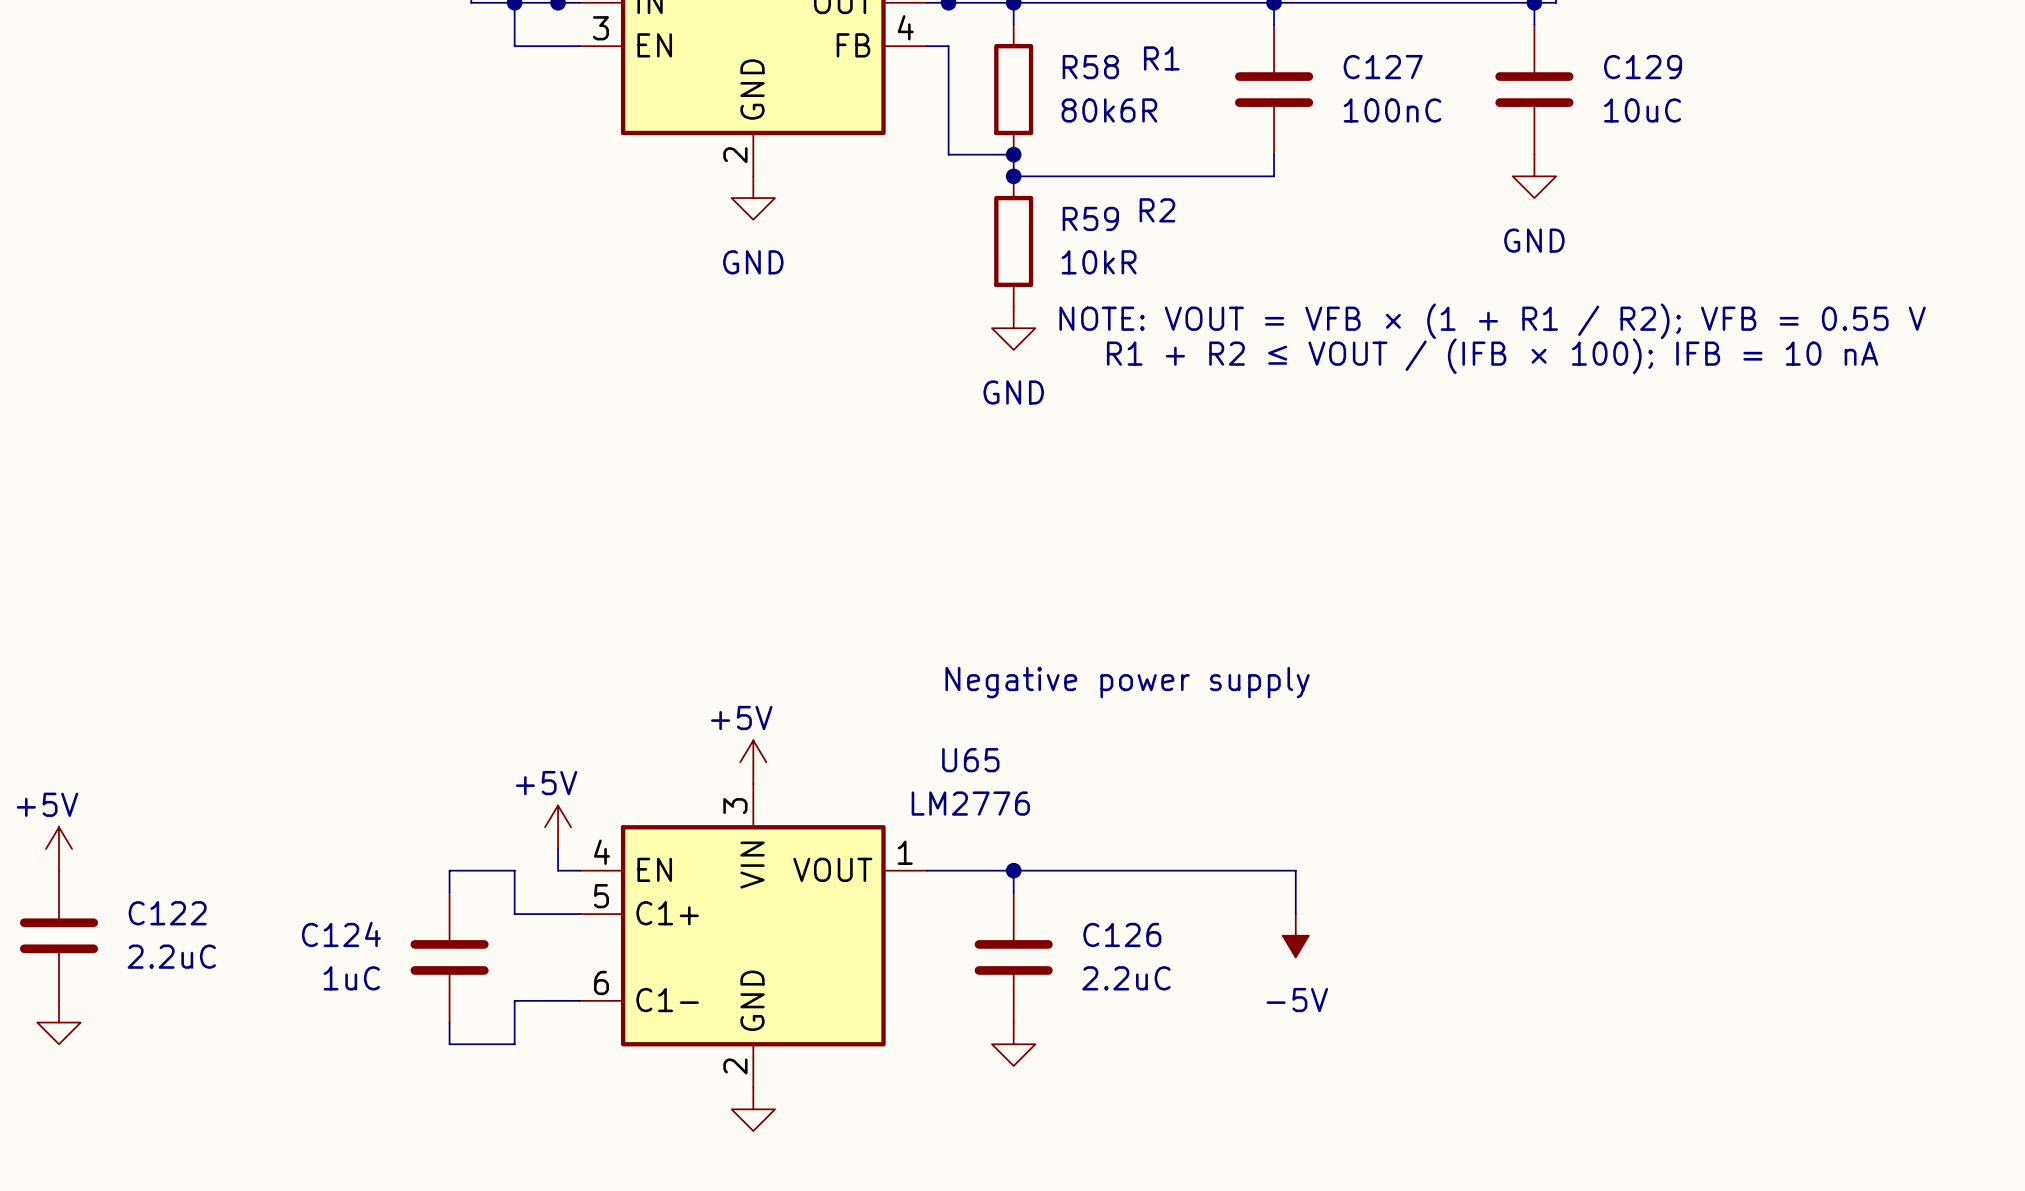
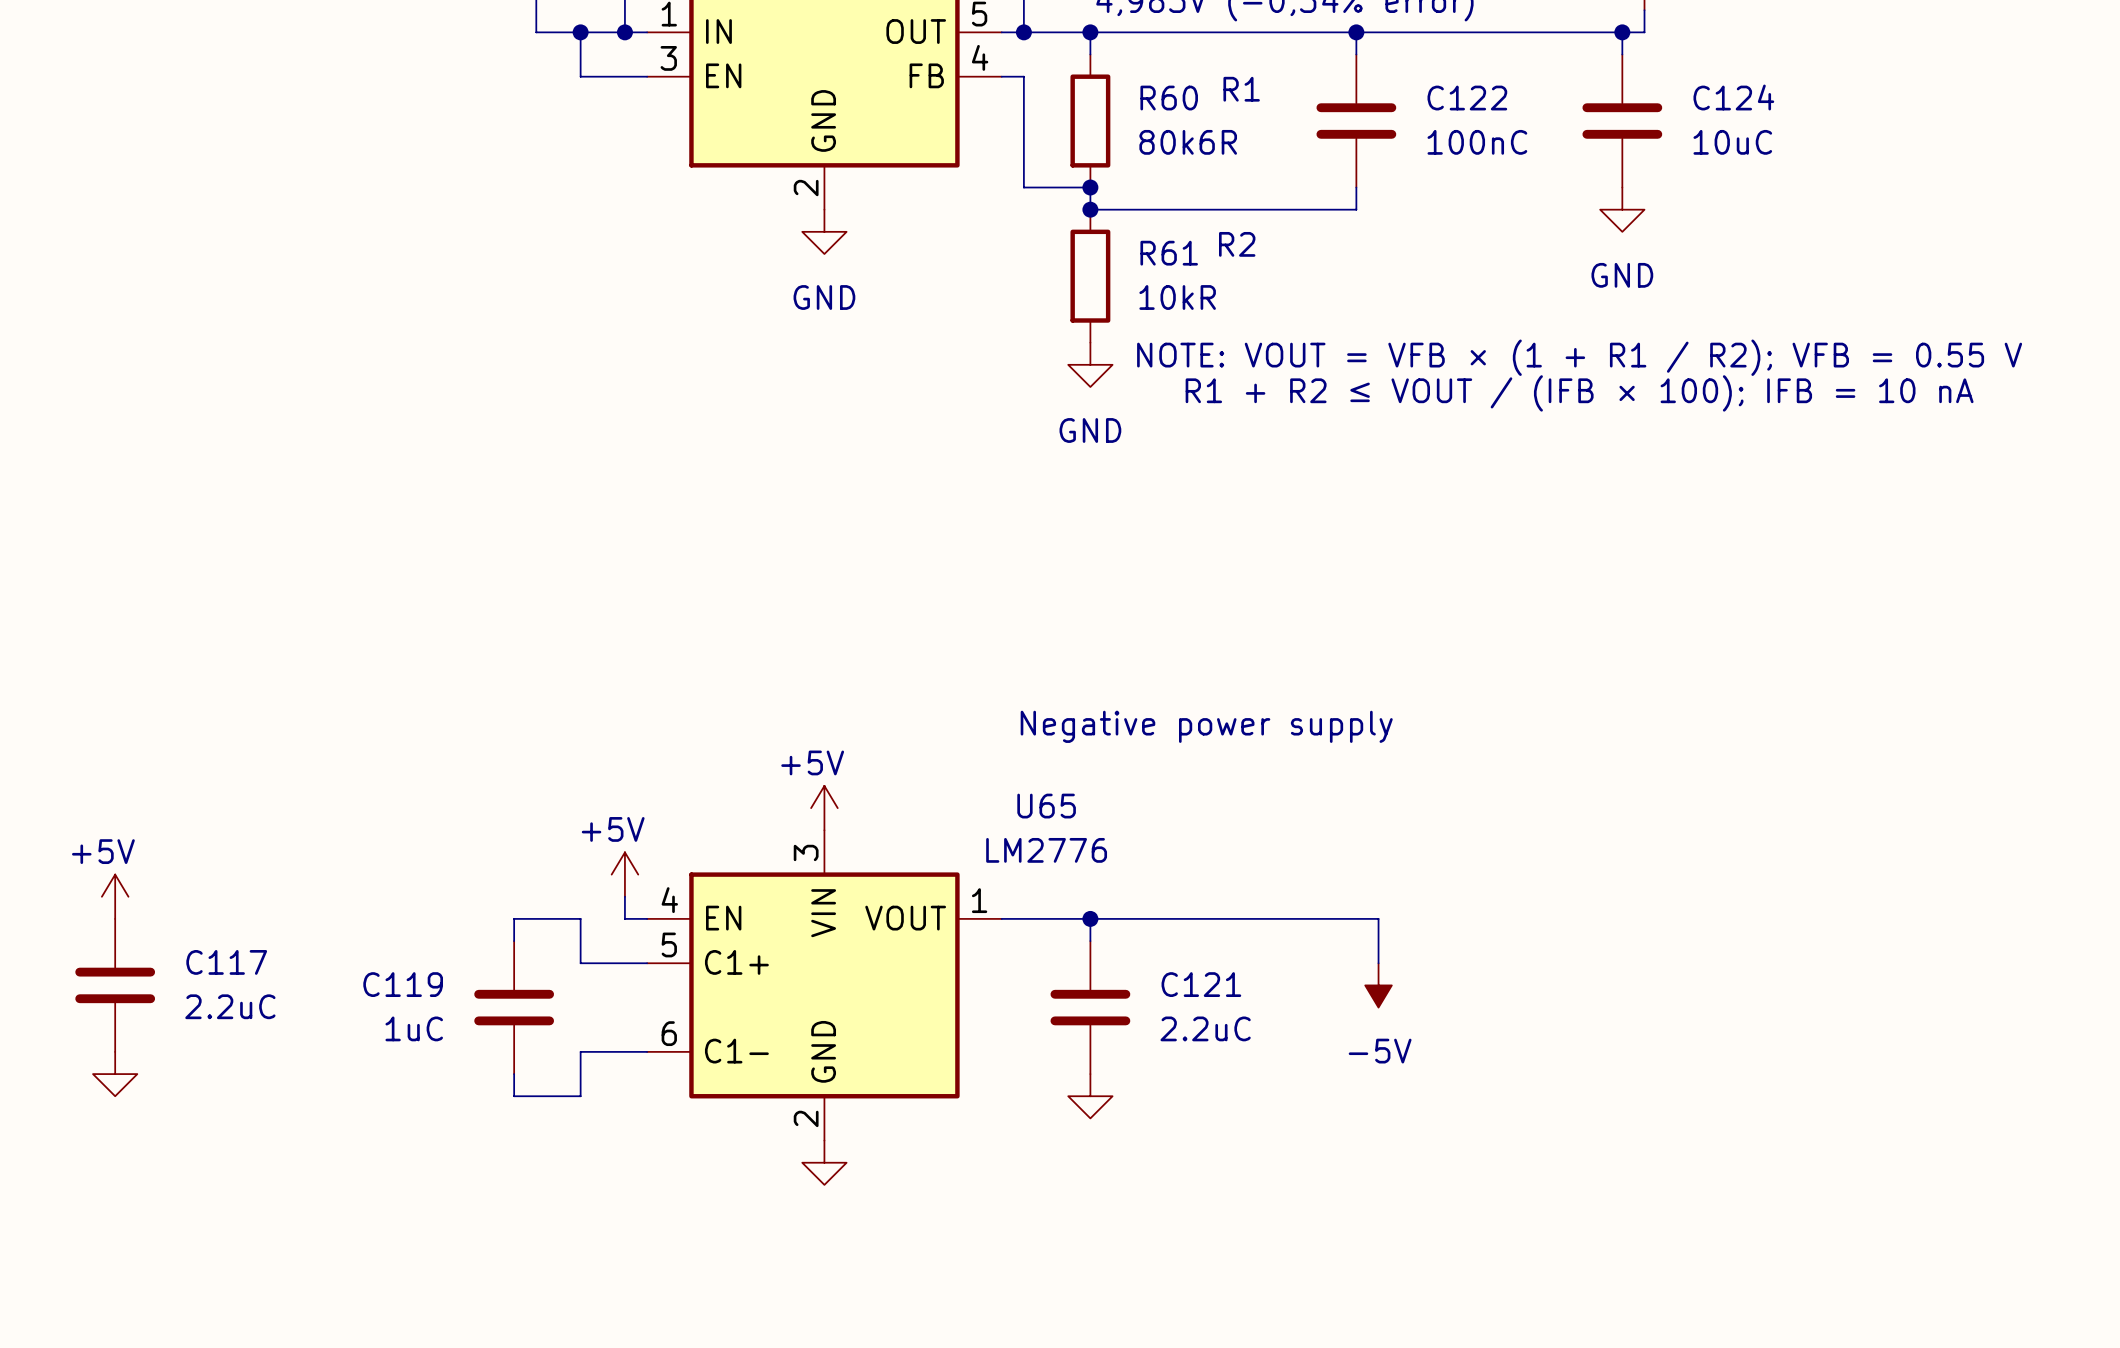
R58 name: R58 (1090, 67) -> R60 (1169, 98)
C127 name: C127 (1383, 67) -> C122 (1467, 98)
C129 name: C129 (1643, 67) -> C124 (1733, 97)
R59 name: R59 (1090, 218) -> R61 (1169, 253)
C122 name: C122 (167, 913) -> C117 (226, 962)
C124 name: C124 (341, 934) -> C119 (403, 984)
C126 name: C126 (1122, 934) -> C121 (1201, 984)

